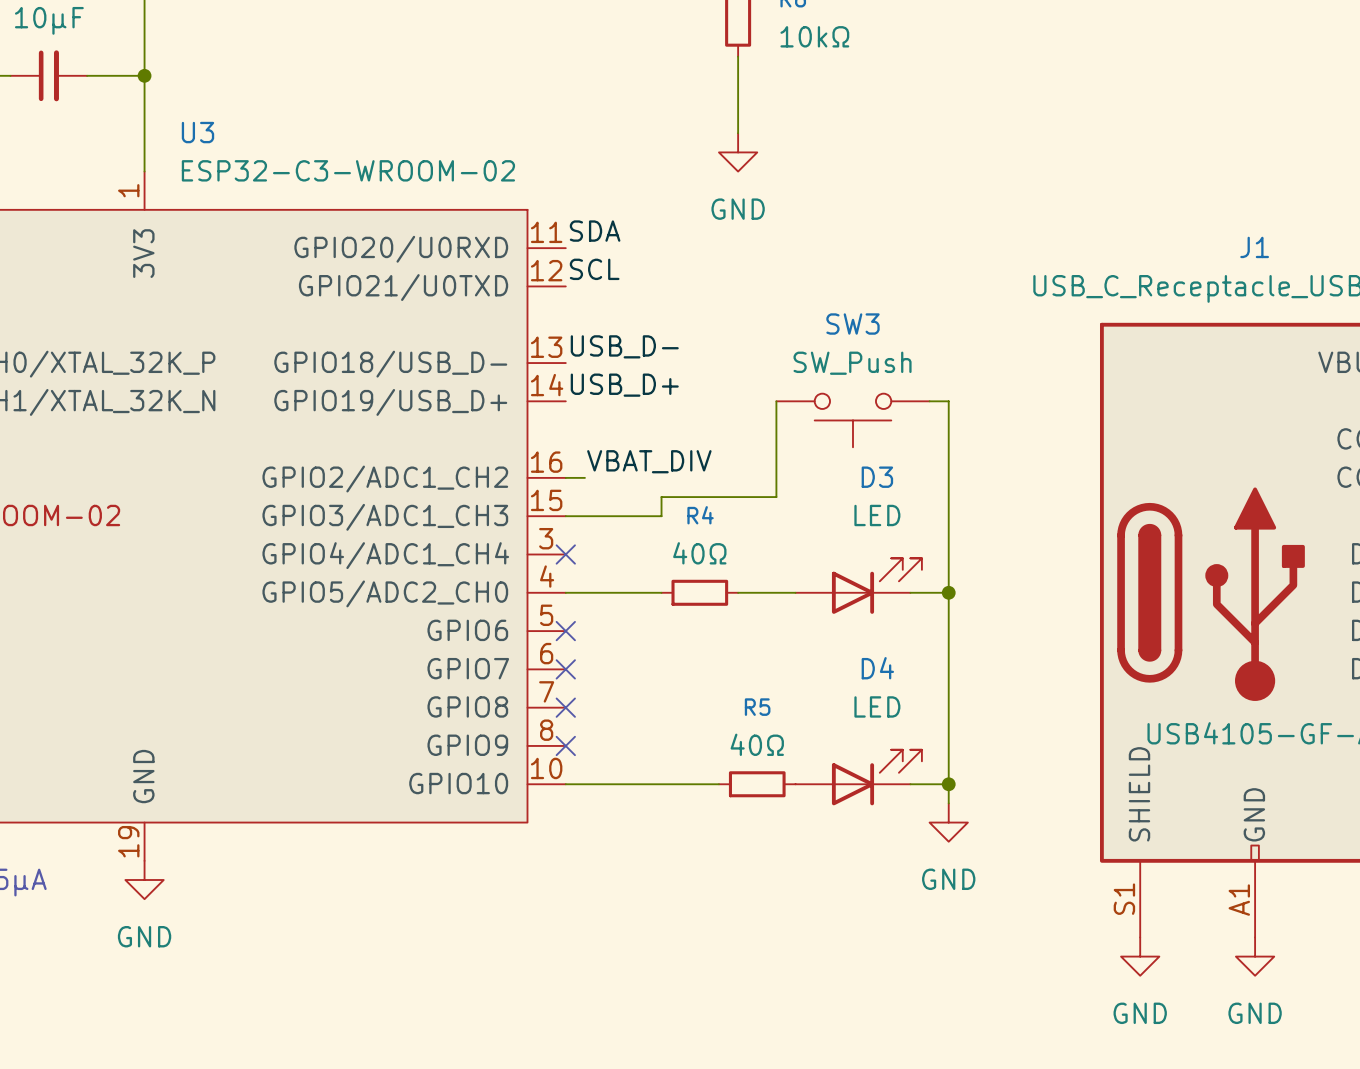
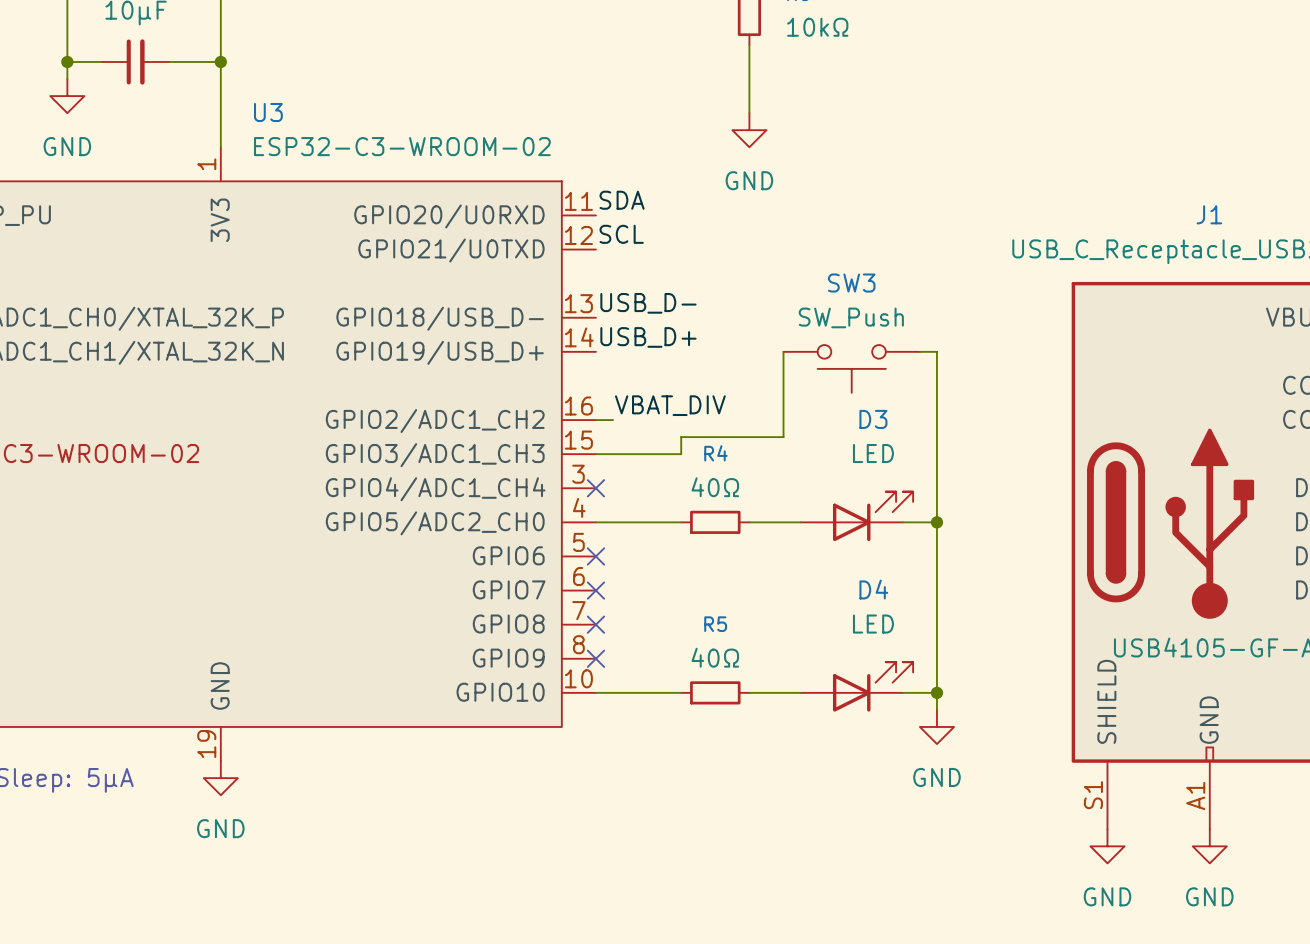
wire: (661, 784) (718, 784) -> (749, 692) (800, 692)
R5 position: (757, 784) -> (715, 692)

